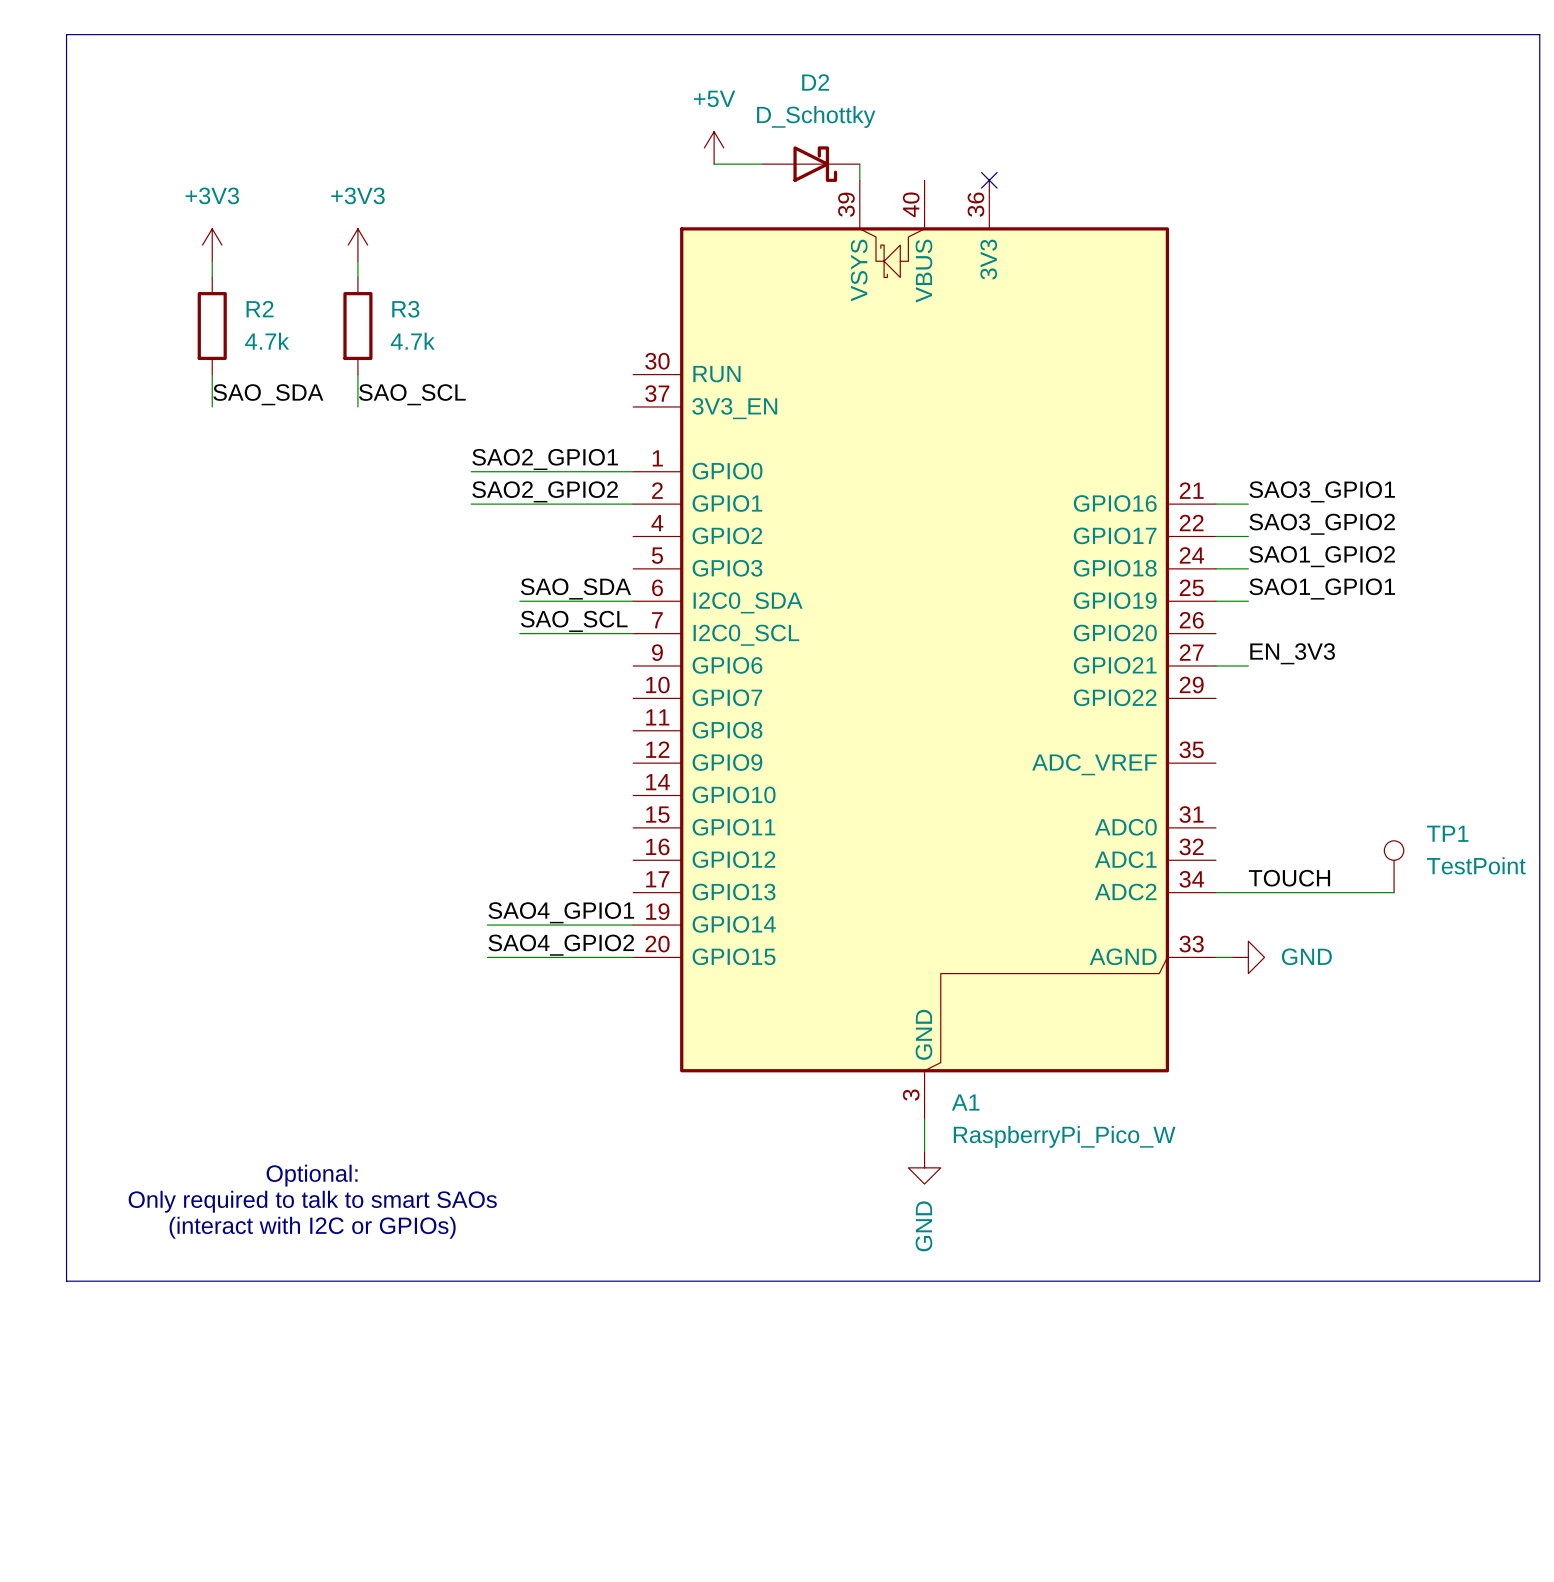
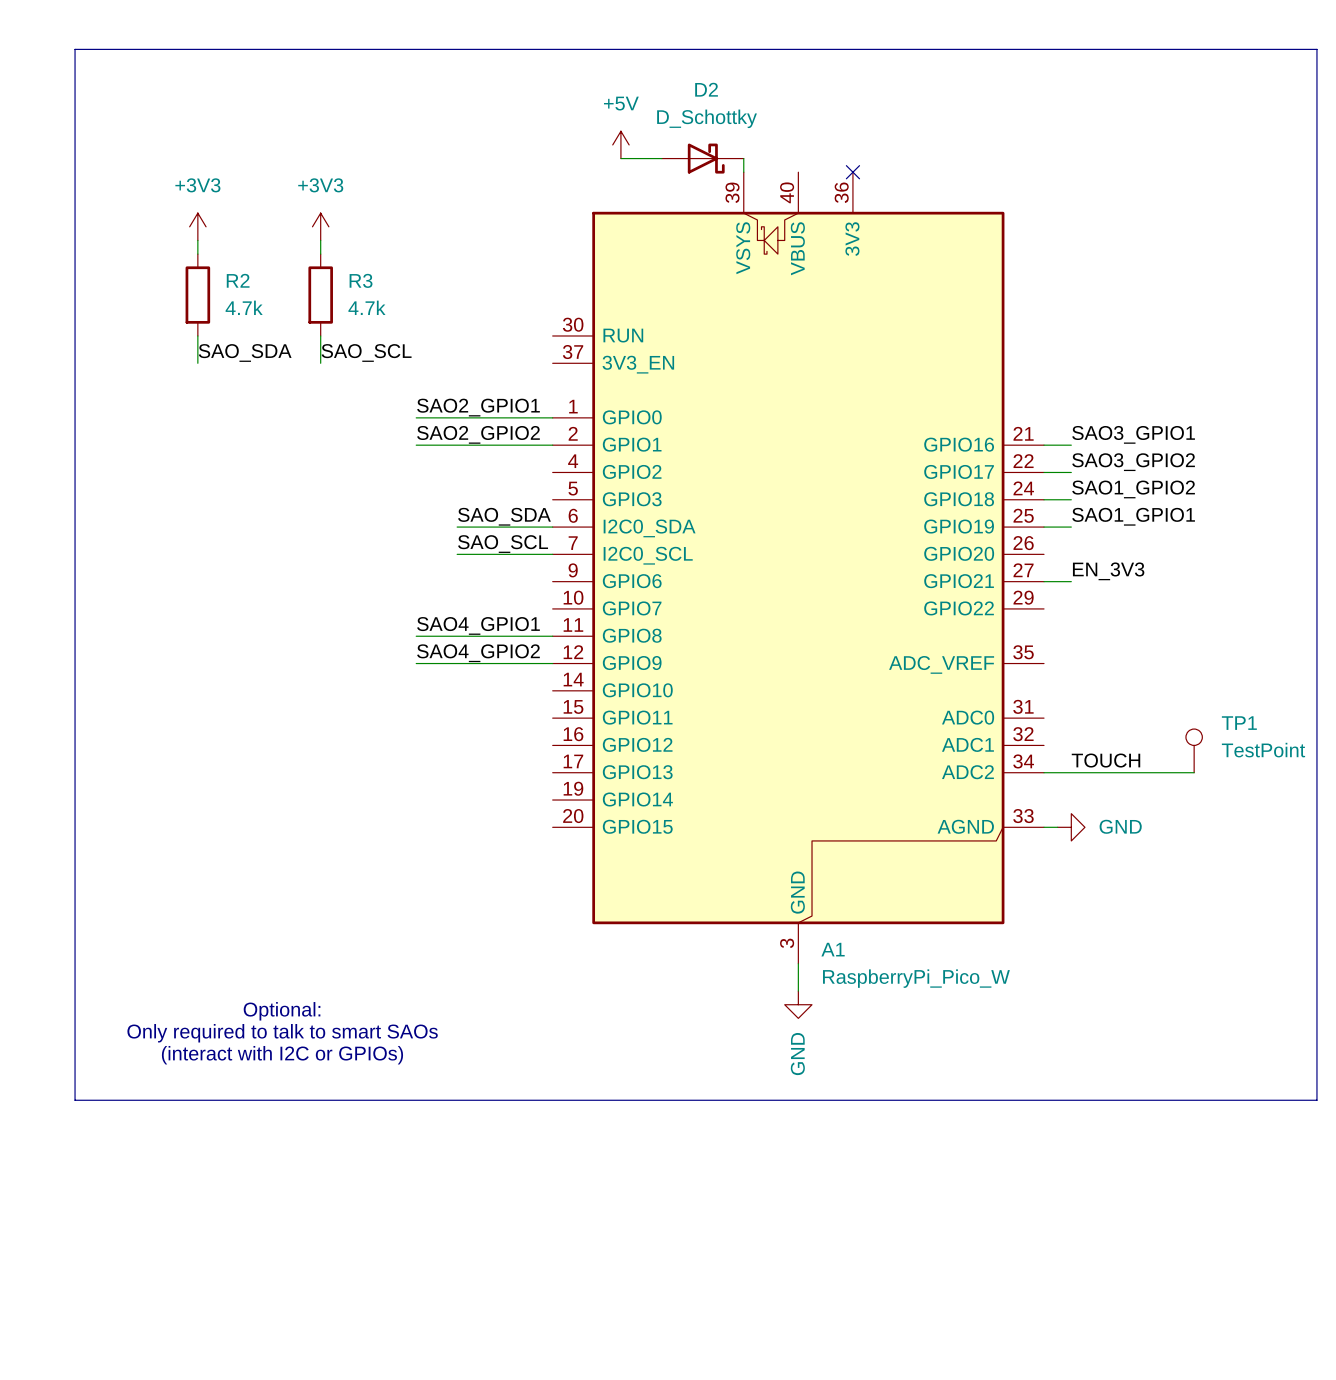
wire: none -> (416, 636) (552, 636)
wire: none -> (416, 663) (552, 663)
label position: SAO4_GPIO1 (561, 912) -> SAO4_GPIO1 (478, 625)
wire: (487, 925) (633, 925) -> none
label position: SAO4_GPIO2 (561, 945) -> SAO4_GPIO2 (478, 653)
wire: (487, 957) (633, 957) -> none

